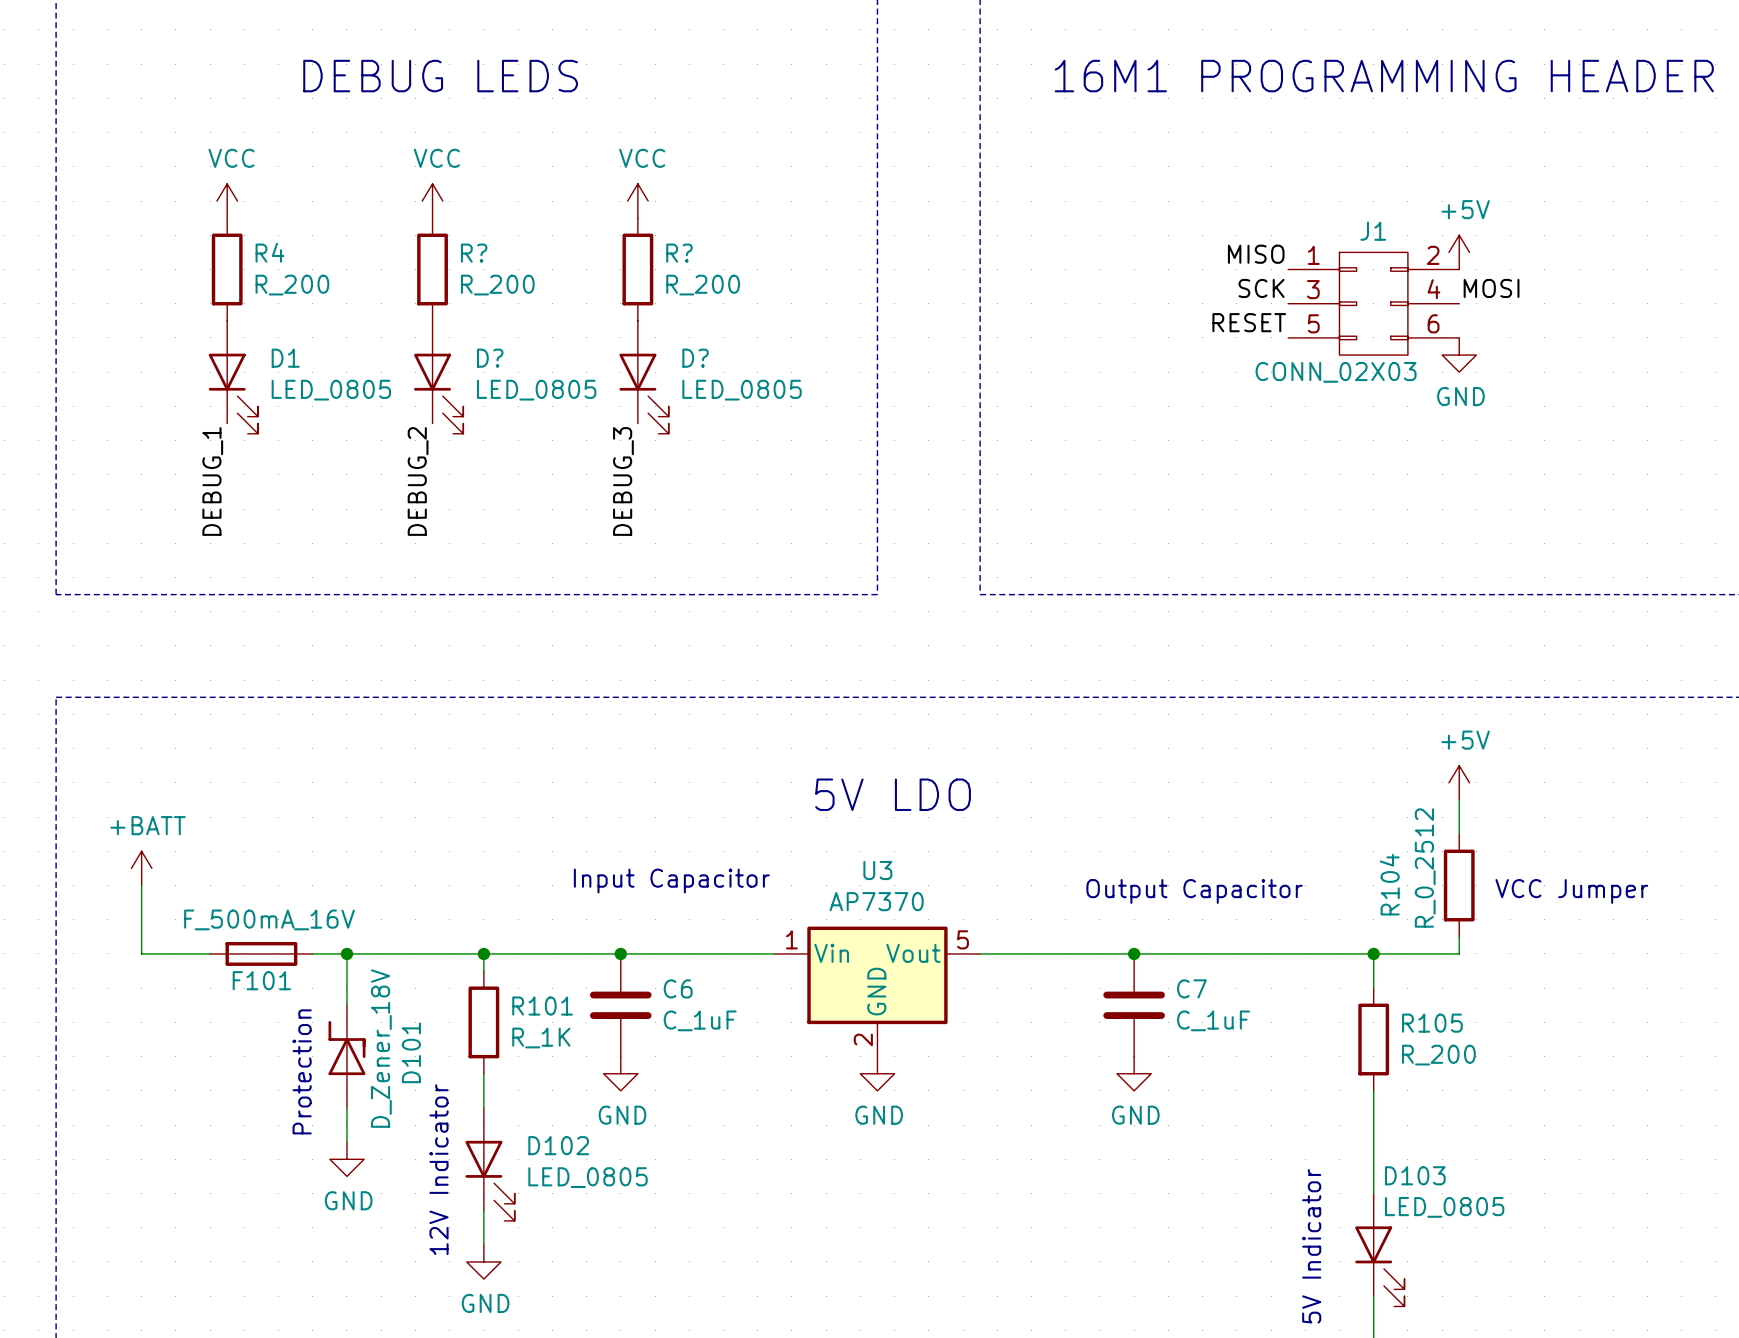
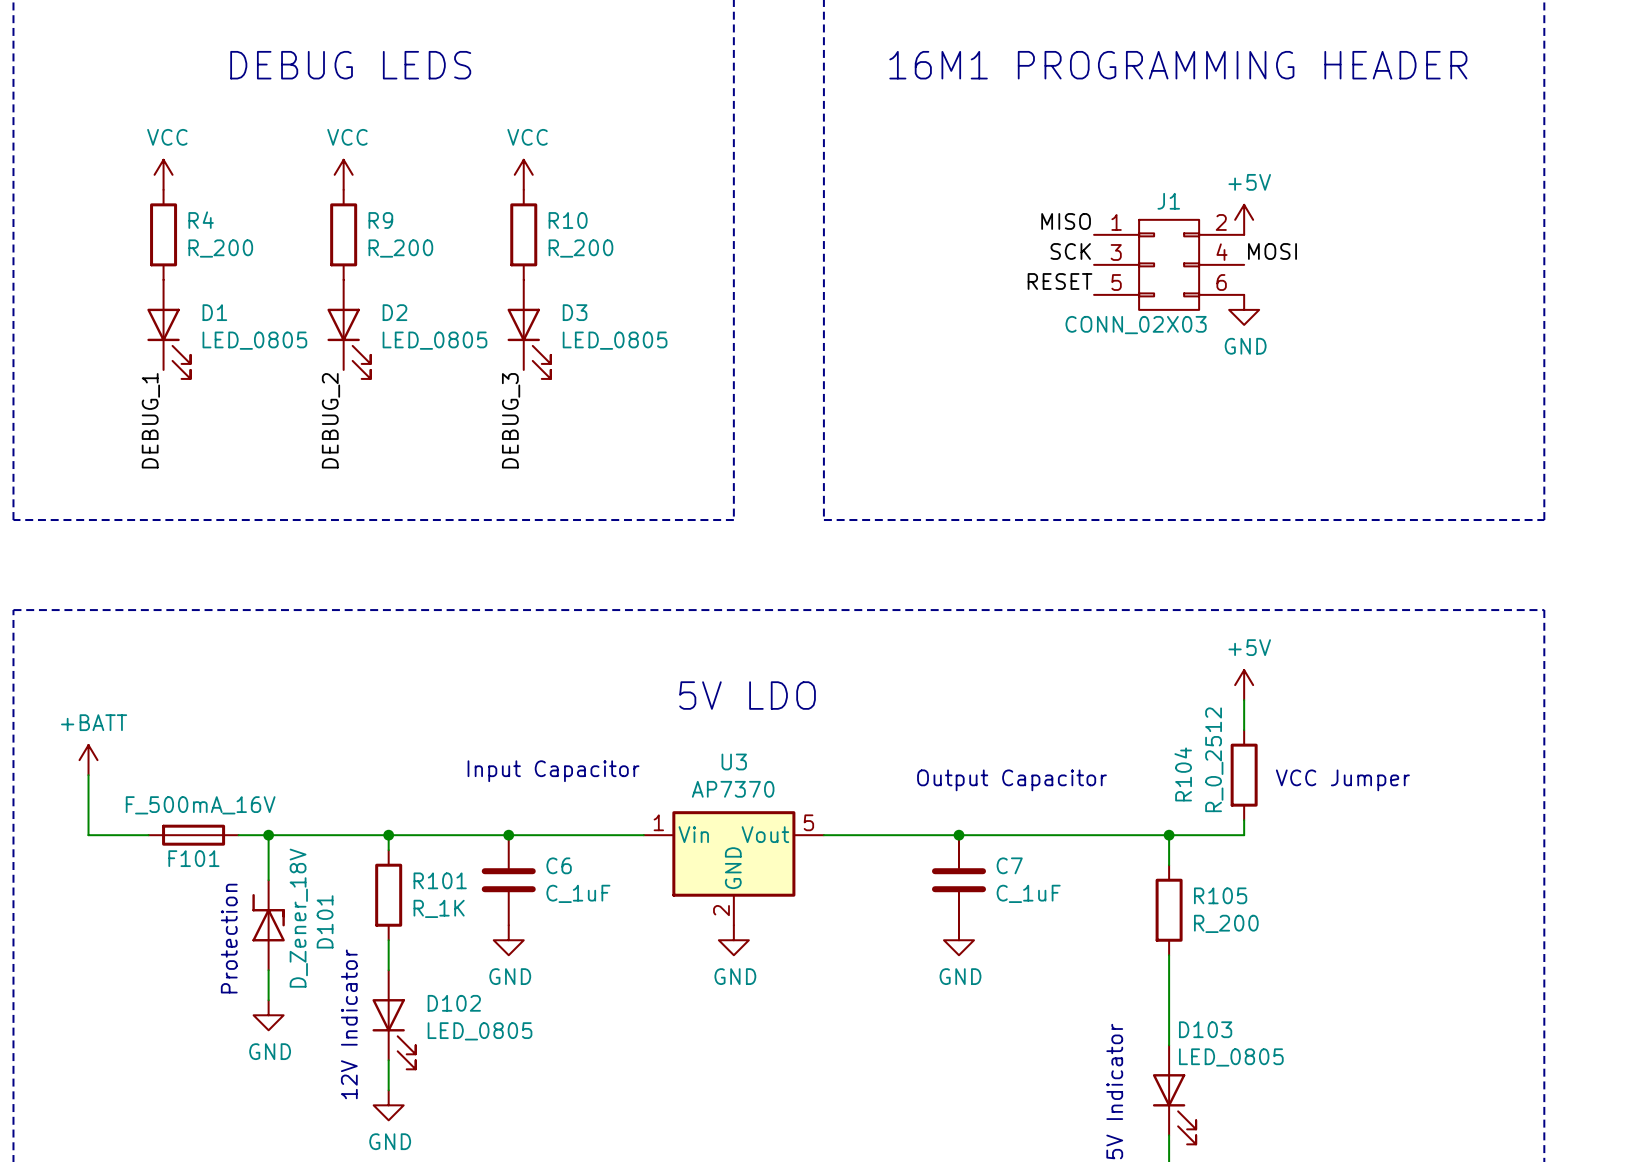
R? name: R? (474, 253) -> R9 (380, 220)
R? name: R? (679, 253) -> R10 (568, 220)
D? name: D? (490, 358) -> D2 (394, 312)
D? name: D? (695, 358) -> D3 (575, 312)

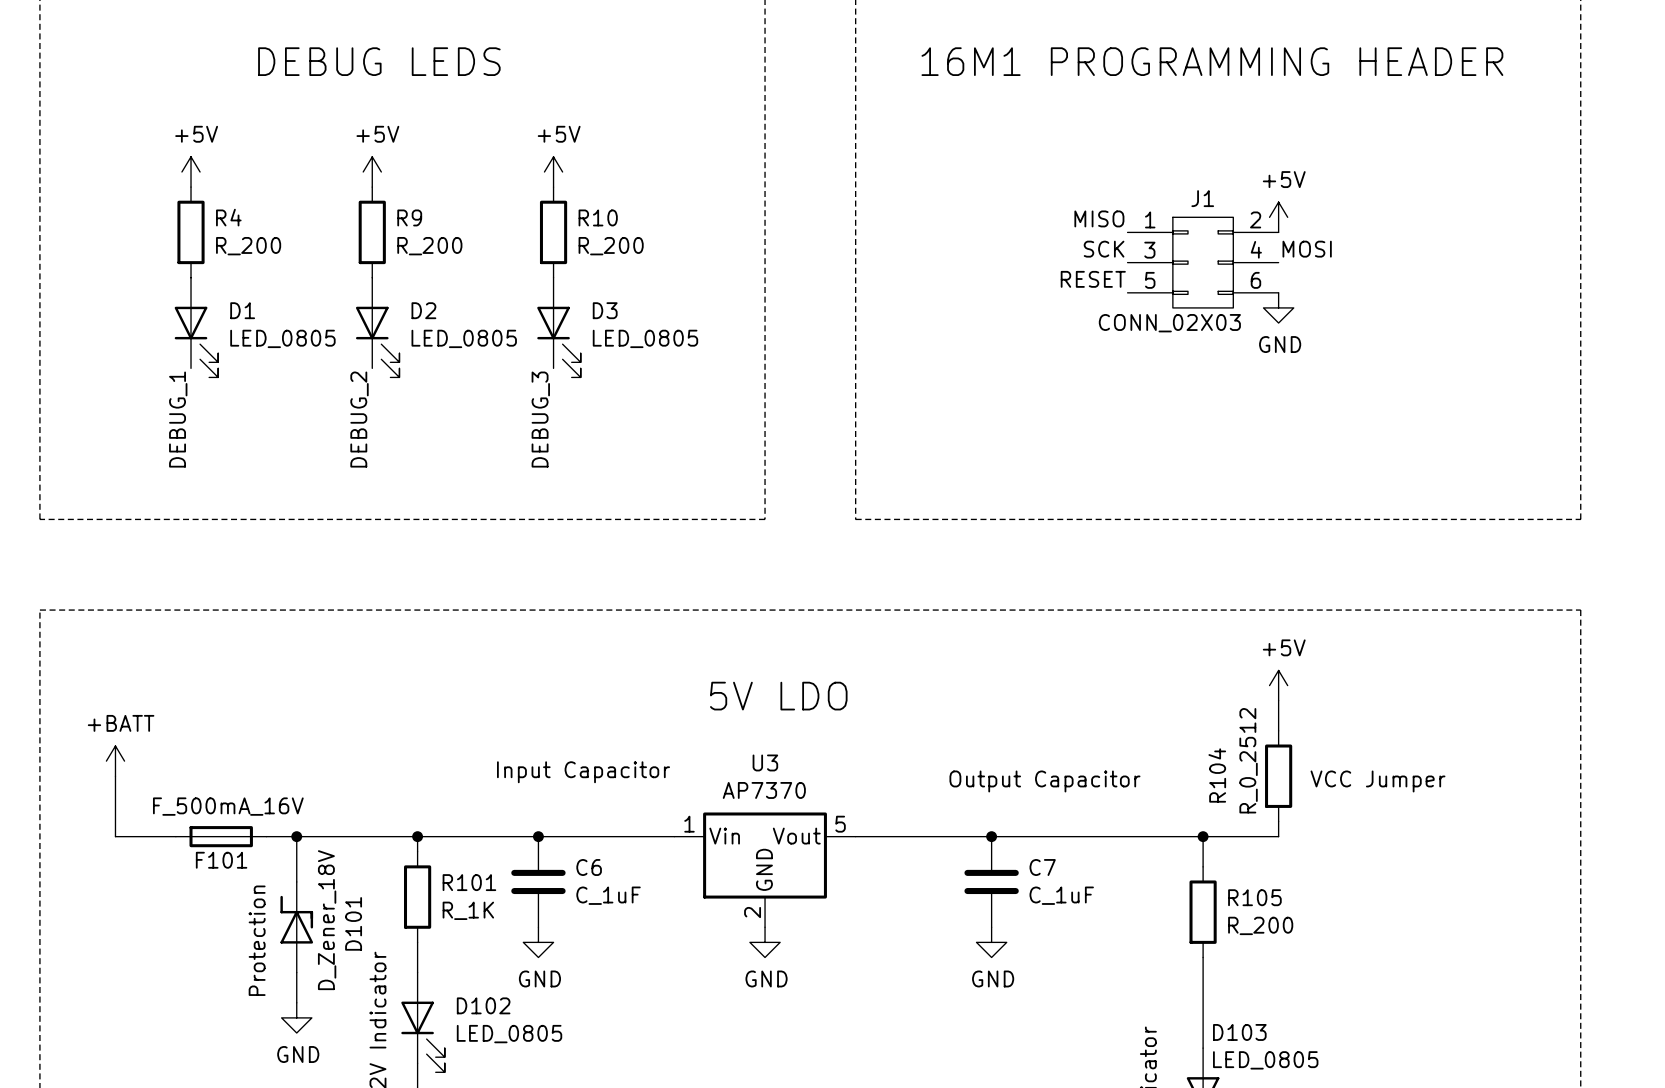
power symbol: VCC (163, 174) -> +5V (191, 171)
power symbol: VCC (343, 174) -> +5V (372, 171)
power symbol: VCC (523, 174) -> +5V (553, 171)

